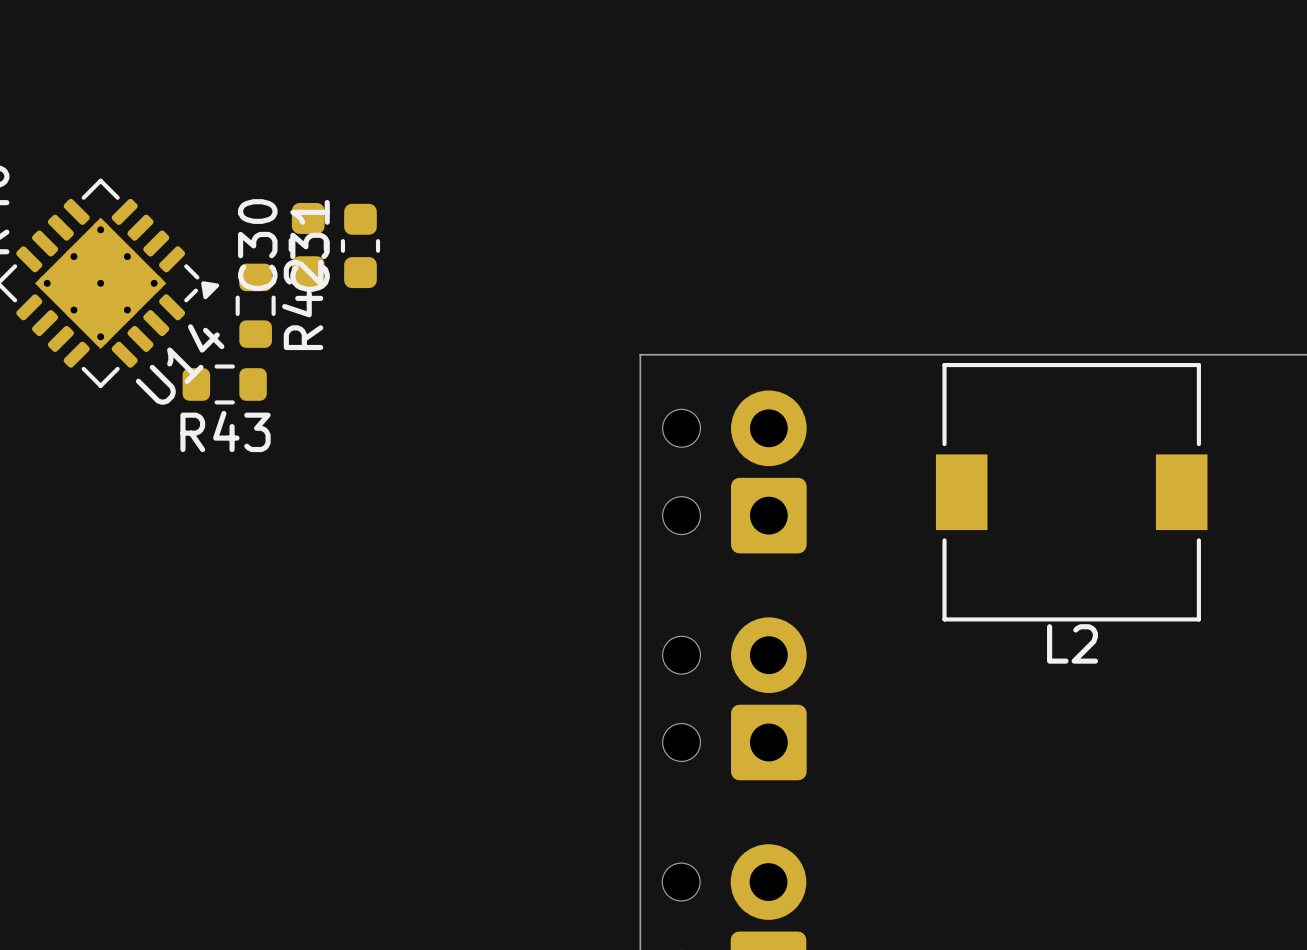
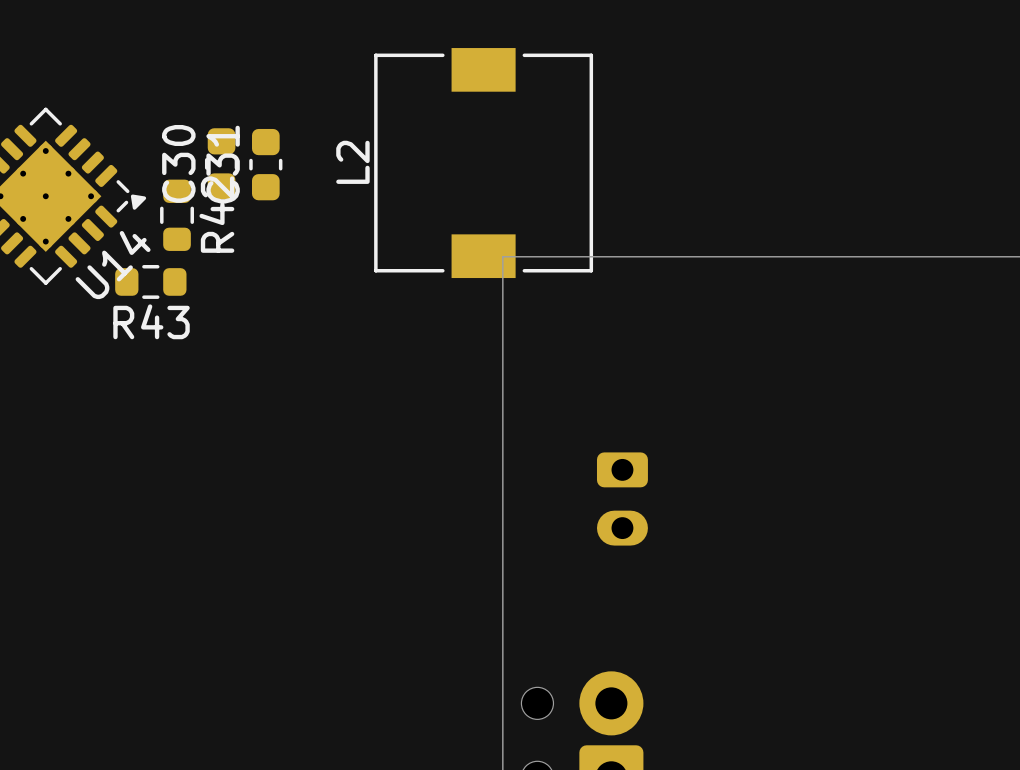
part: (734, 471) -> none
L2 rotation: 0° (1071, 492) -> 90° clockwise (483, 163)
L2 position: (1071, 492) -> (483, 163)
part: none -> (622, 498)
part: (734, 698) -> none

